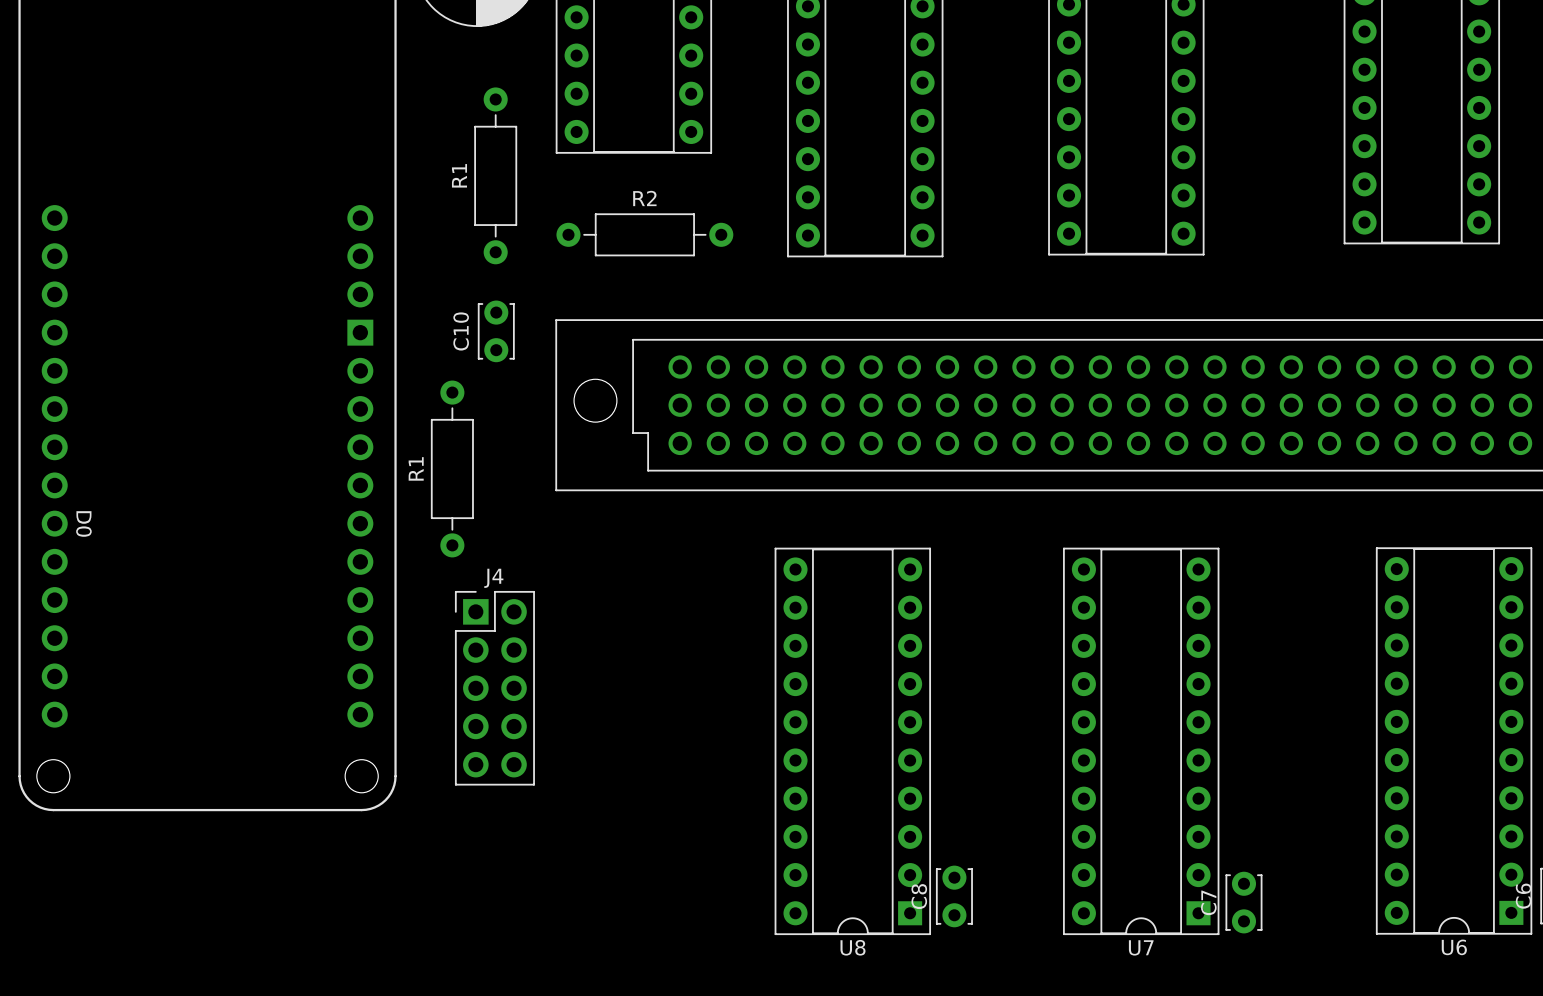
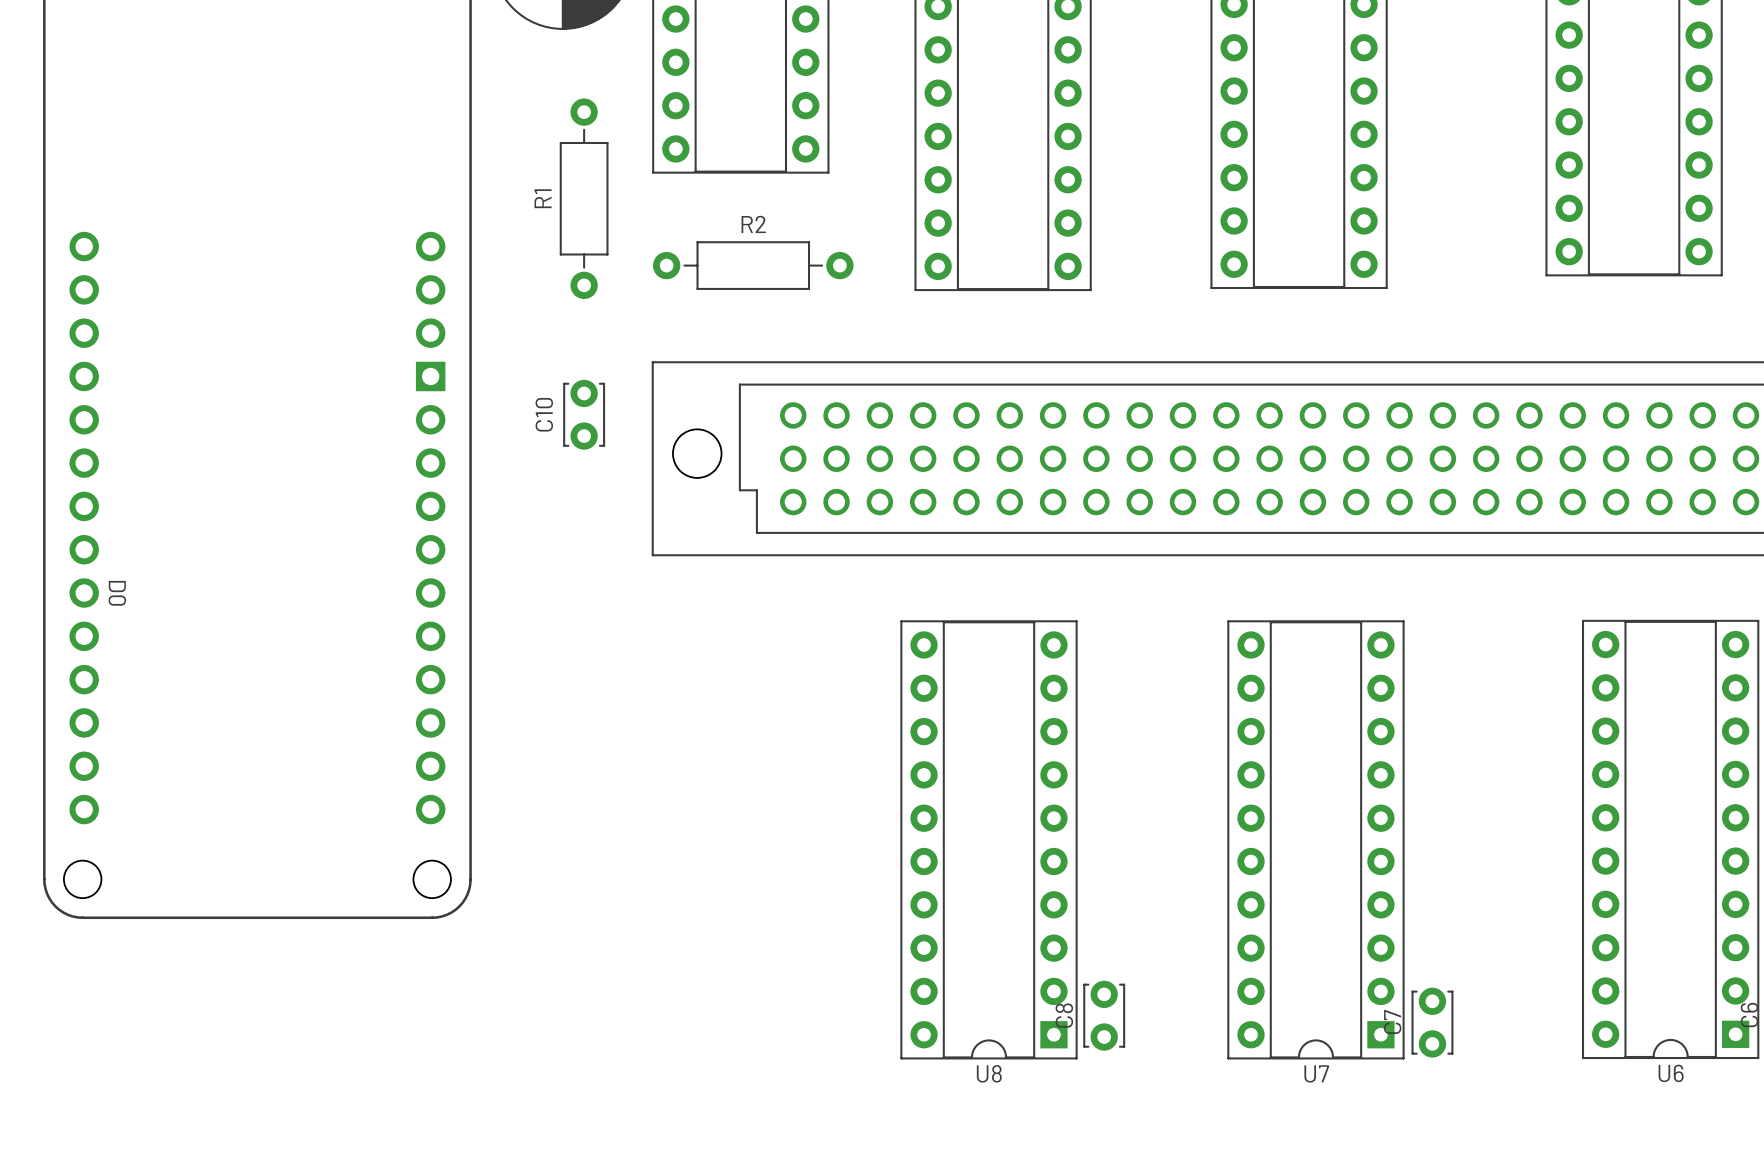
C10 position: (496, 331) -> (584, 414)
R1: (452, 468) -> none
J4: (494, 688) -> none

